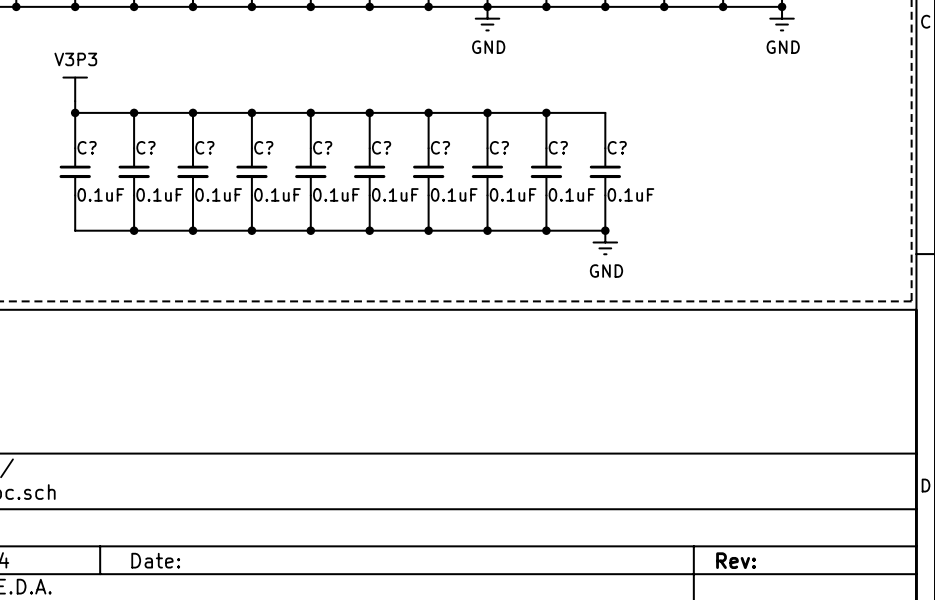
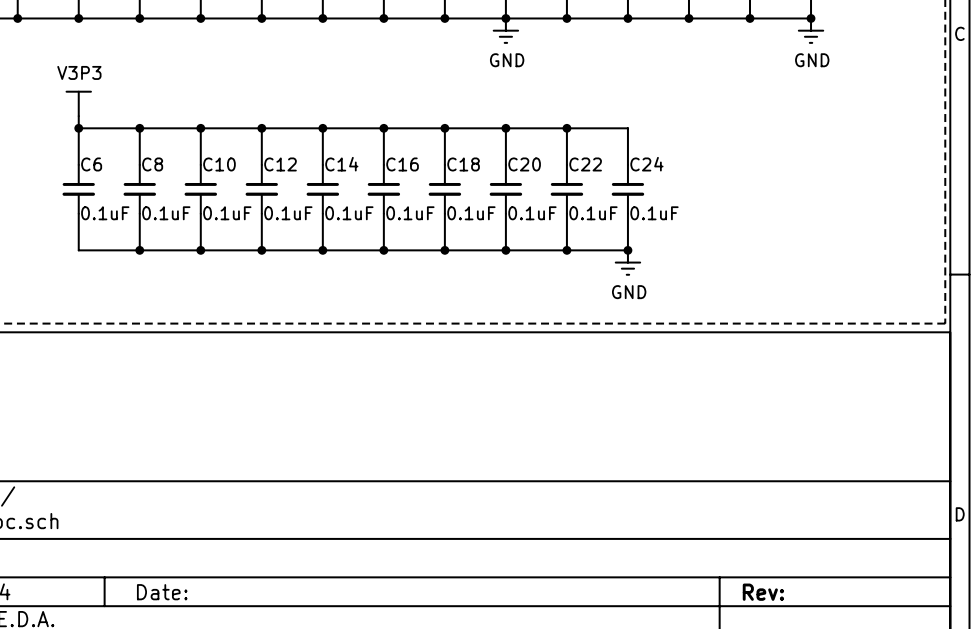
C? name: C? (87, 147) -> C6 (91, 164)
C? name: C? (145, 147) -> C8 (152, 164)
C? name: C? (204, 147) -> C10 (219, 164)
C? name: C? (263, 147) -> C12 (280, 164)
C? name: C? (322, 147) -> C14 (341, 164)
C? name: C? (381, 147) -> C16 (402, 164)
C? name: C? (440, 147) -> C18 (463, 164)
C? name: C? (499, 147) -> C20 (524, 164)
C? name: C? (558, 147) -> C22 (585, 164)
C? name: C? (617, 147) -> C24 (646, 164)

